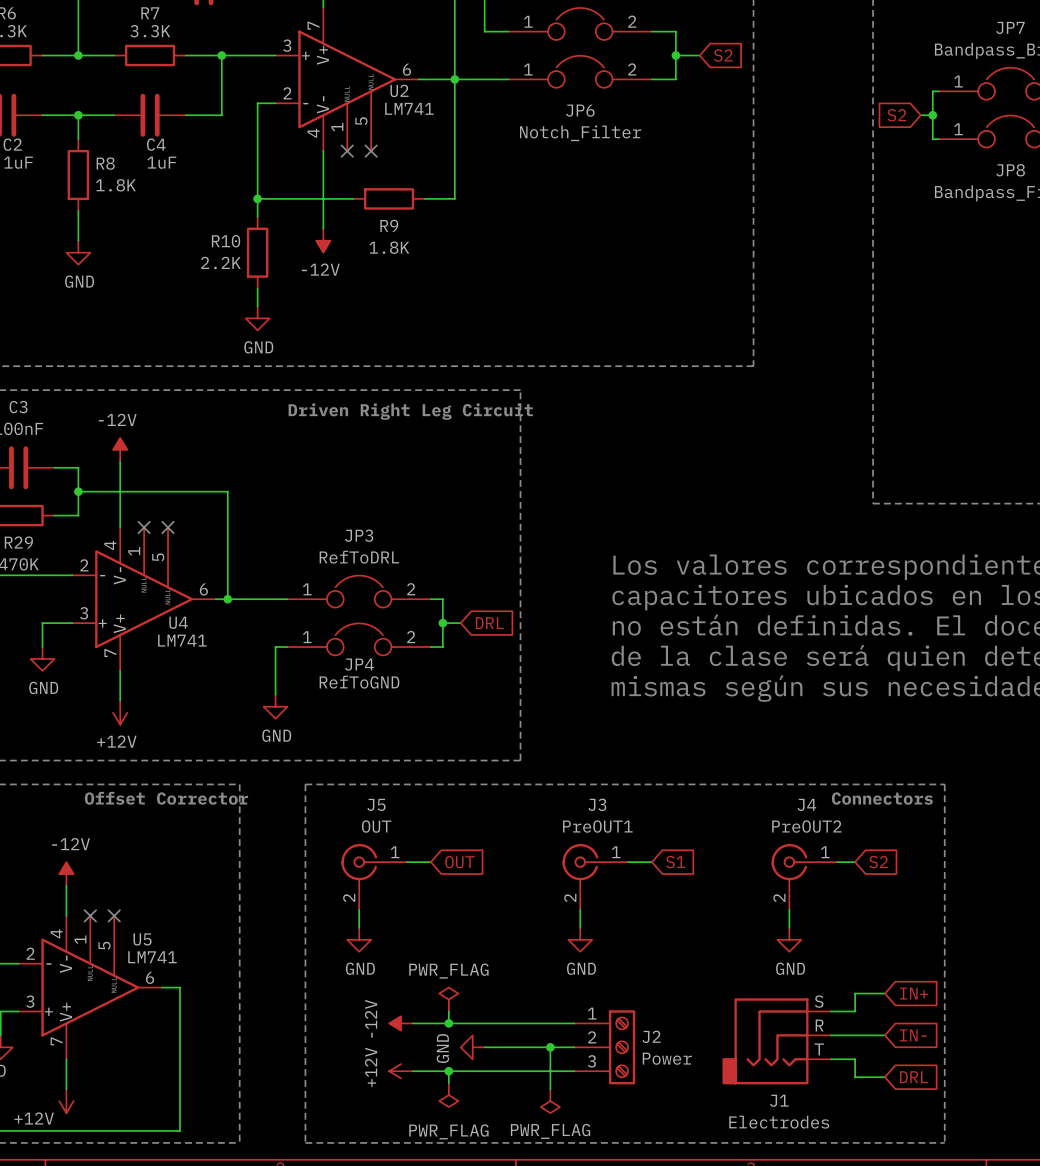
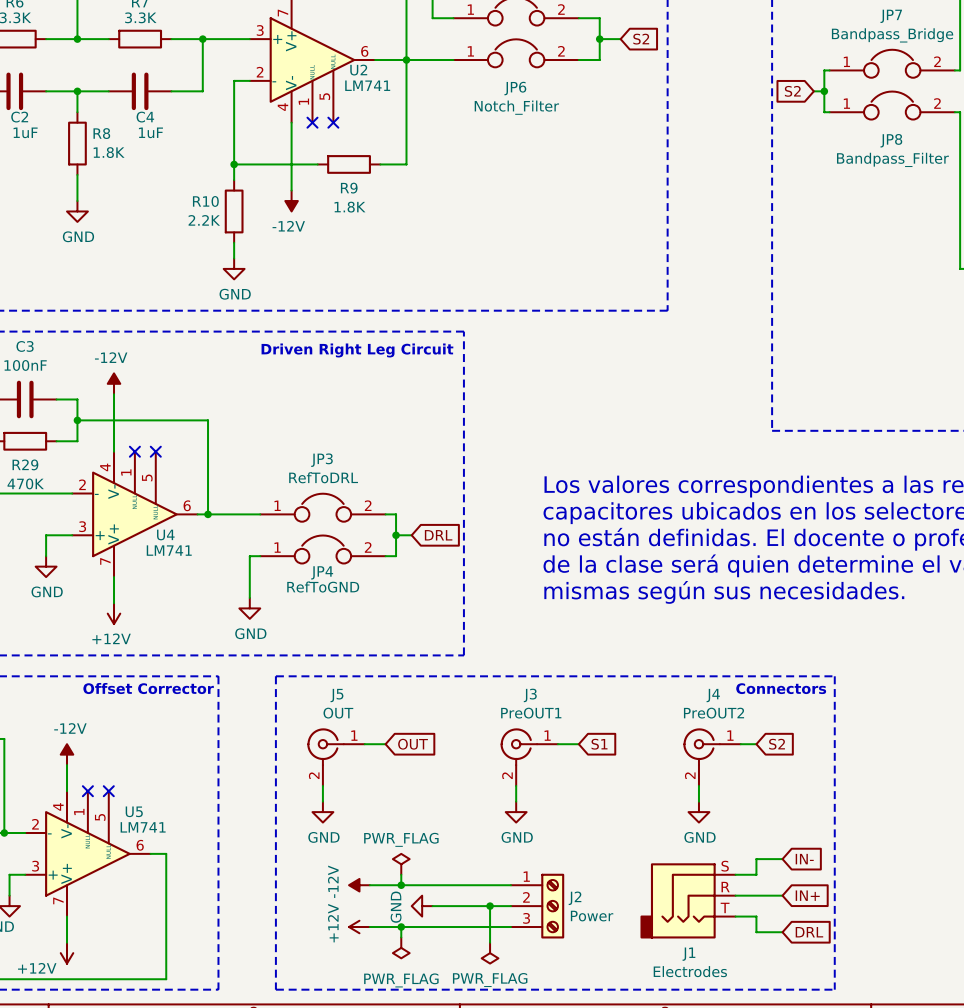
global label: IN+ (914, 993) -> IN- (804, 859)
global label: IN- (913, 1035) -> IN+ (807, 895)

